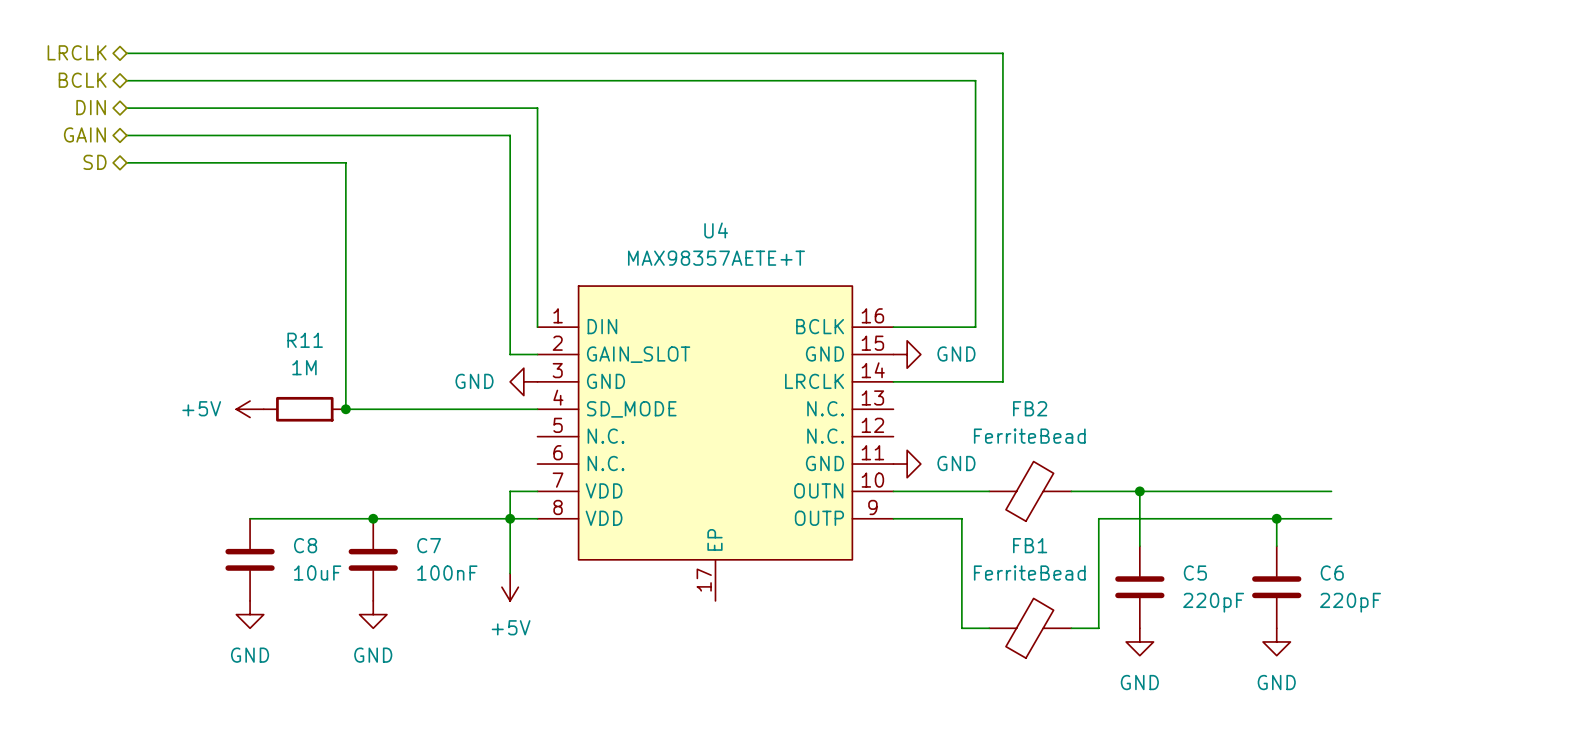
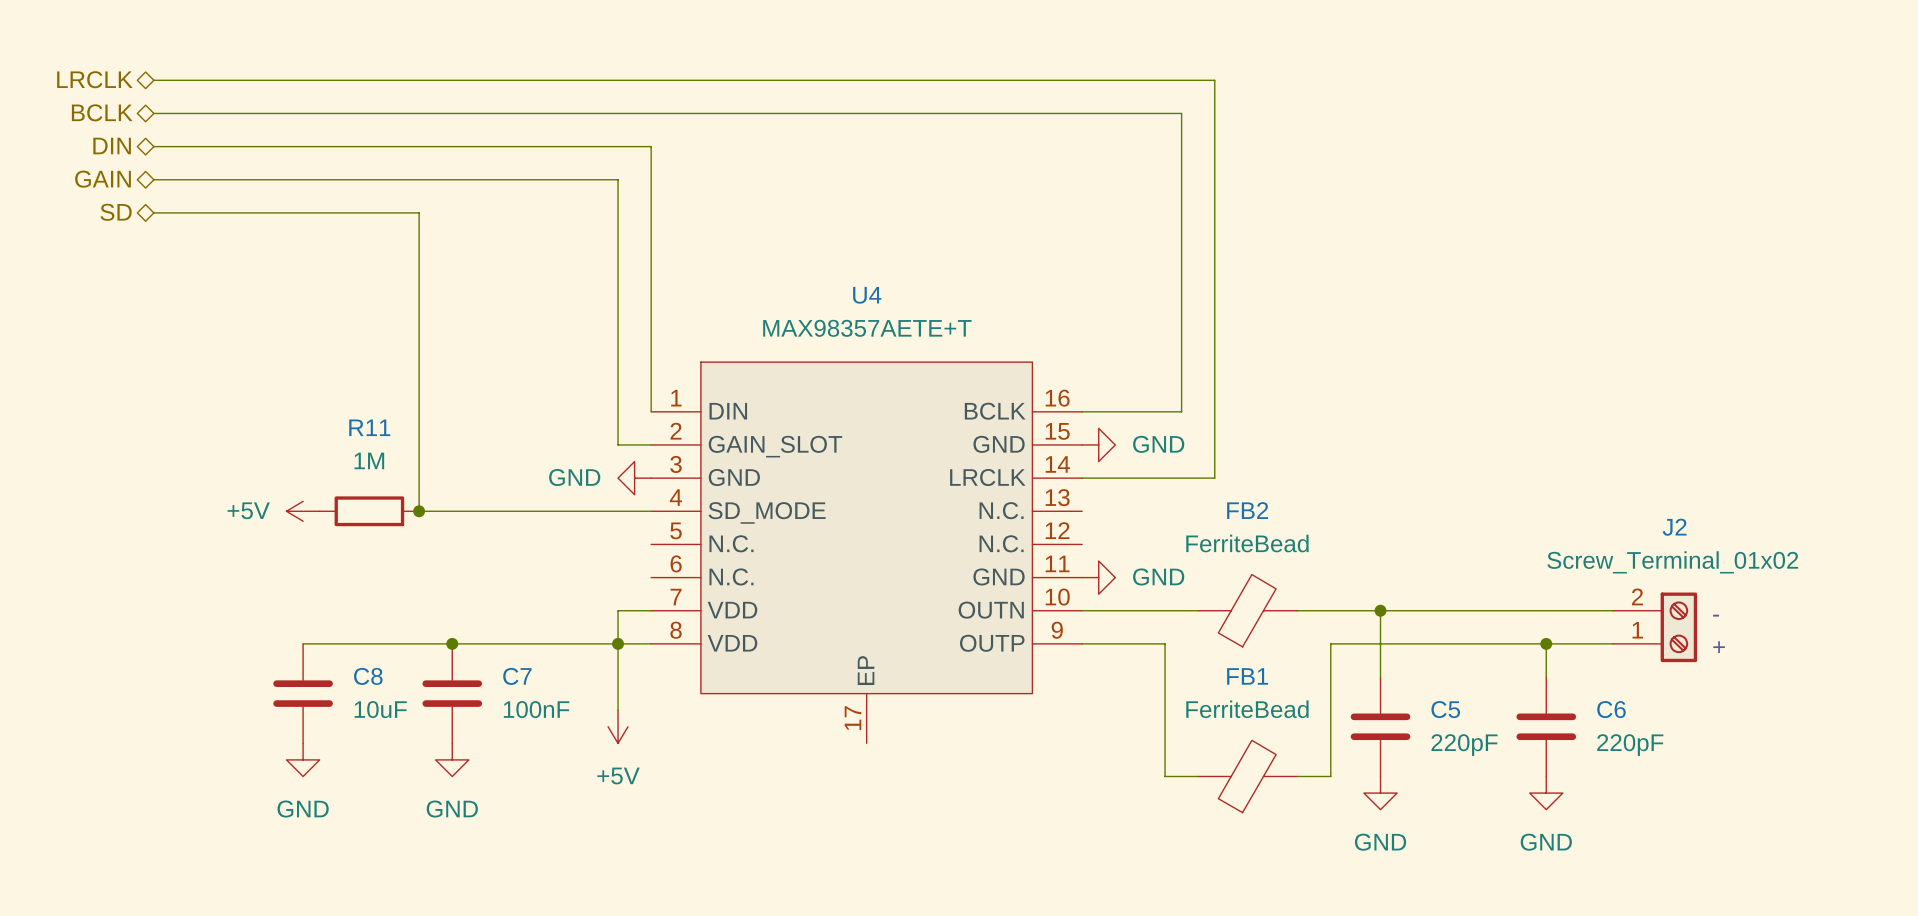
text: none -> - (1716, 615)
J2: none -> Screw_Terminal_01x02 (1654, 627)
text: none -> + (1719, 647)

